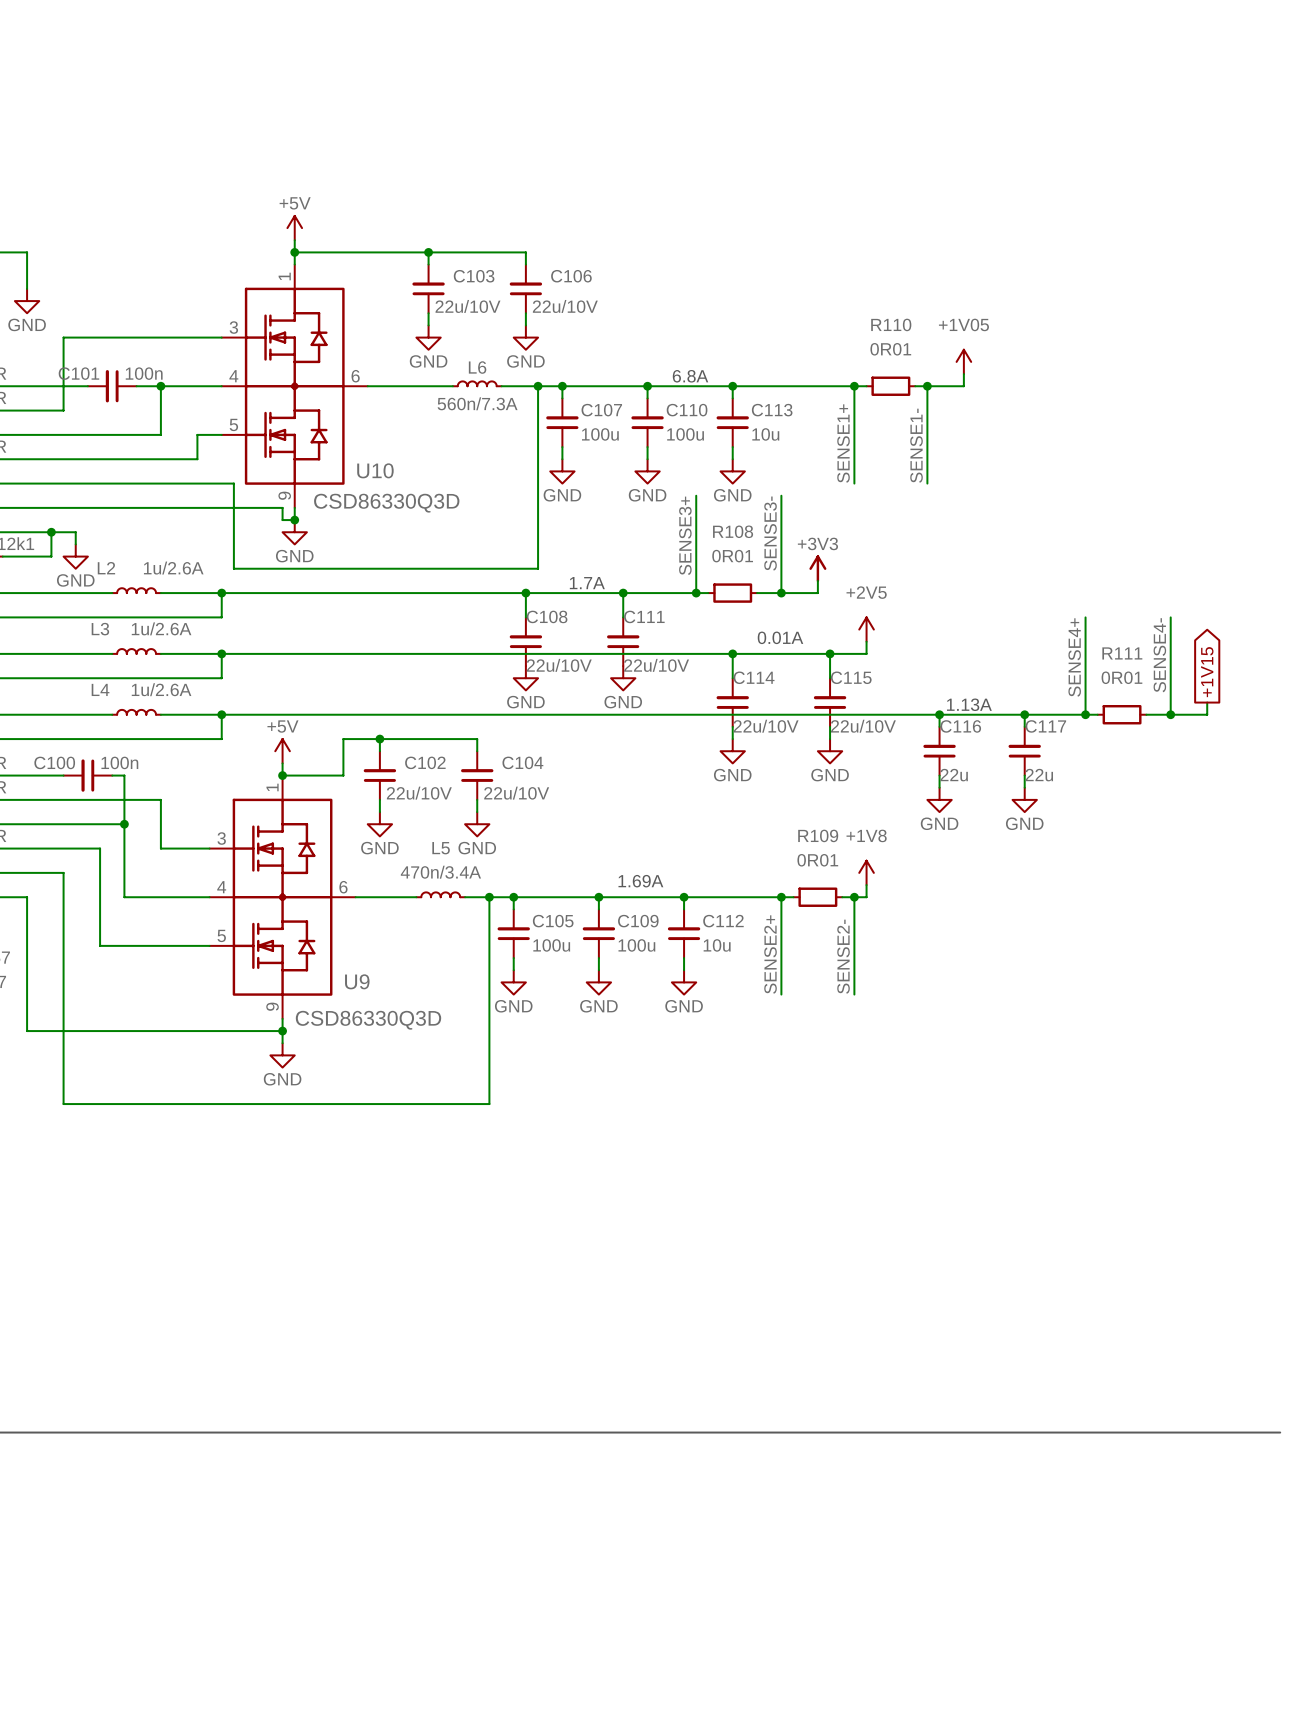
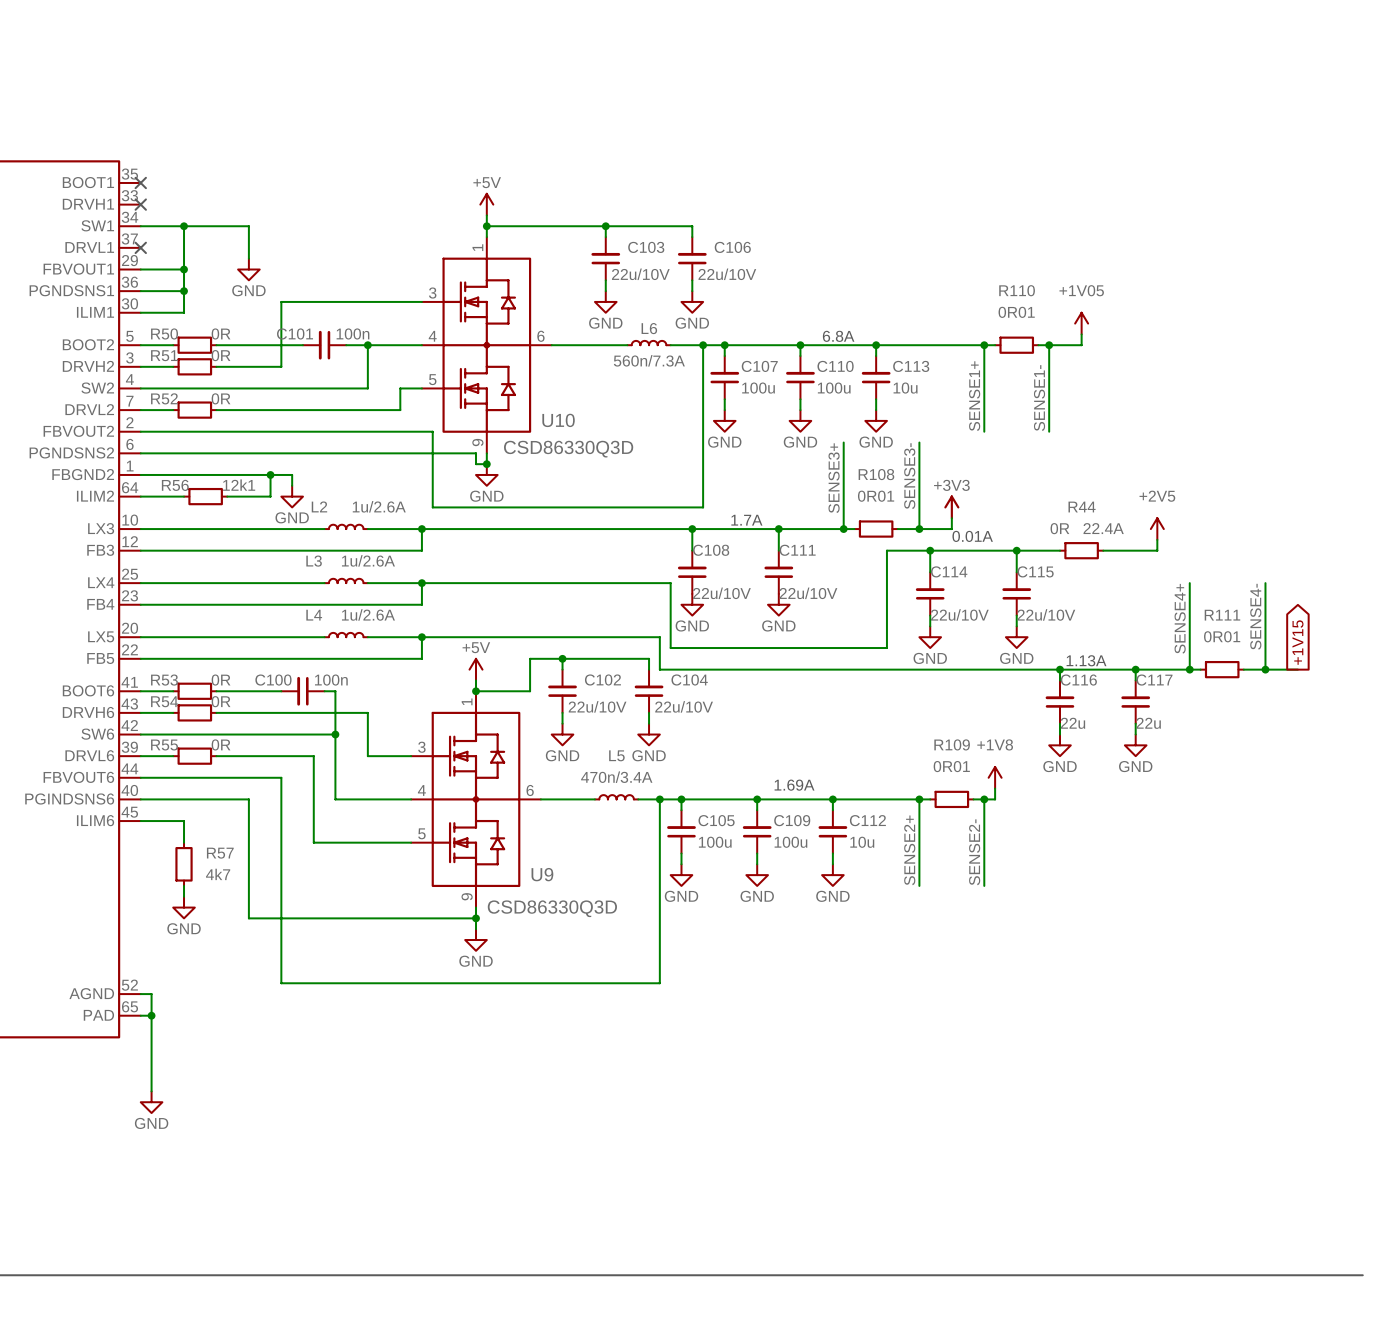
junction: none -> (930, 550)
junction: none -> (1016, 550)
R44: none -> (1081, 550)
wire: (1085, 617) (1085, 653) -> (1189, 637) (1189, 669)
wire: (1170, 617) (1170, 653) -> (1265, 637) (1265, 669)
power symbol position: +2V5 (866, 629) -> +2V5 (1157, 529)
text position: 0.01A (780, 637) -> 0.01A (972, 536)
wire: (866, 641) (866, 653) (501, 653) -> (1059, 550) (886, 550) (886, 648) (670, 648) (670, 583)
wire: (732, 653) (732, 678) -> (930, 550) (930, 572)
junction: (732, 653) -> none
wire: (830, 653) (830, 678) -> (1016, 550) (1016, 572)
junction: (830, 653) -> none
label position: SENSE4- (1159, 655) -> SENSE4- (1255, 616)
label position: SENSE4+ (1074, 657) -> SENSE4+ (1180, 618)
global label position: +1V15 (1207, 672) -> +1V15 (1297, 642)
C114 position: (732, 702) -> (930, 593)
C115 position: (830, 702) -> (1016, 593)
wire: (1207, 702) (1207, 714) (1146, 714) -> (1157, 539) (1157, 550) (1103, 550)
text position: 1.13A (969, 704) -> 1.13A (1086, 660)
wire: (489, 714) (1097, 714) -> (659, 637) (659, 669) (1200, 669)
power symbol: none -> GND (930, 637)
power symbol: none -> GND (1016, 637)
junction position: (939, 714) -> (1059, 669)
junction: (1024, 714) -> none
junction: (1085, 714) -> none
R111 position: (1122, 714) -> (1222, 669)
junction position: (1170, 714) -> (1265, 669)
wire: (732, 726) (732, 739) -> (930, 615) (930, 626)
wire: (830, 726) (830, 739) -> (1016, 615) (1016, 626)
power symbol: GND (732, 751) -> none
power symbol: GND (830, 751) -> none
C116 position: (939, 751) -> (1059, 702)
junction: none -> (1135, 669)
C117 position: (1024, 751) -> (1135, 702)
junction: none -> (1189, 669)
wire: none -> (1243, 669) (1297, 669)
power symbol position: GND (939, 799) -> GND (1059, 745)
power symbol position: GND (1024, 799) -> GND (1135, 745)

